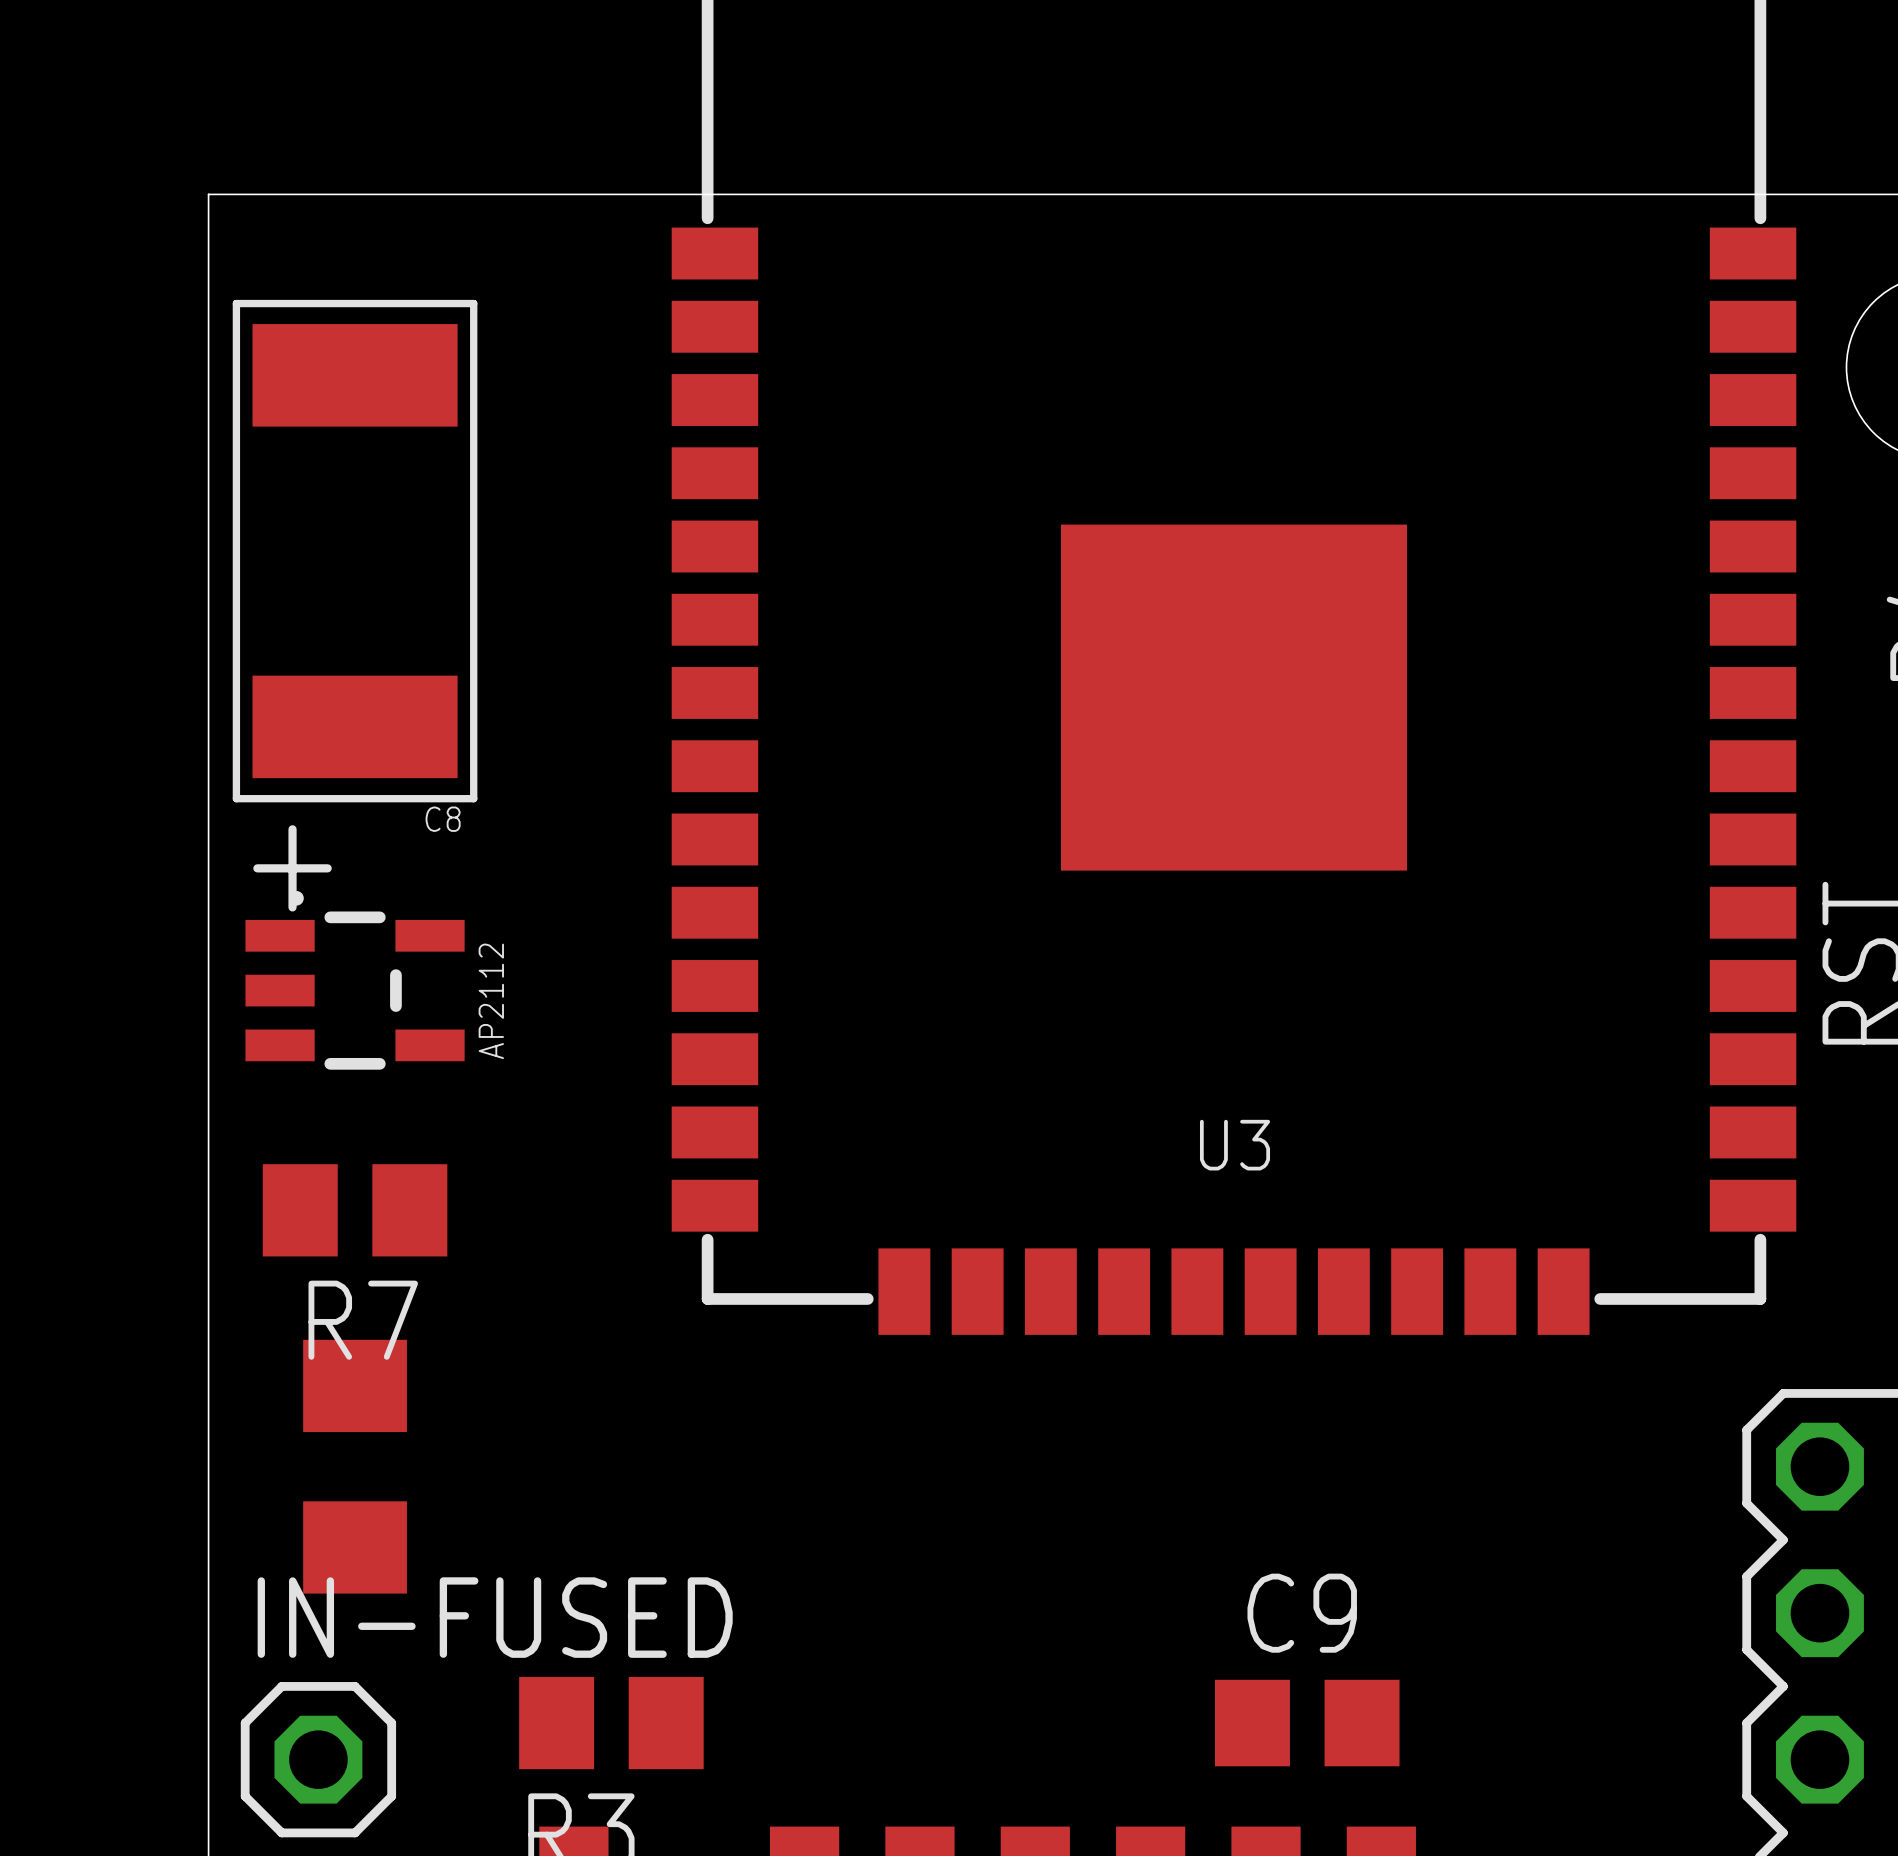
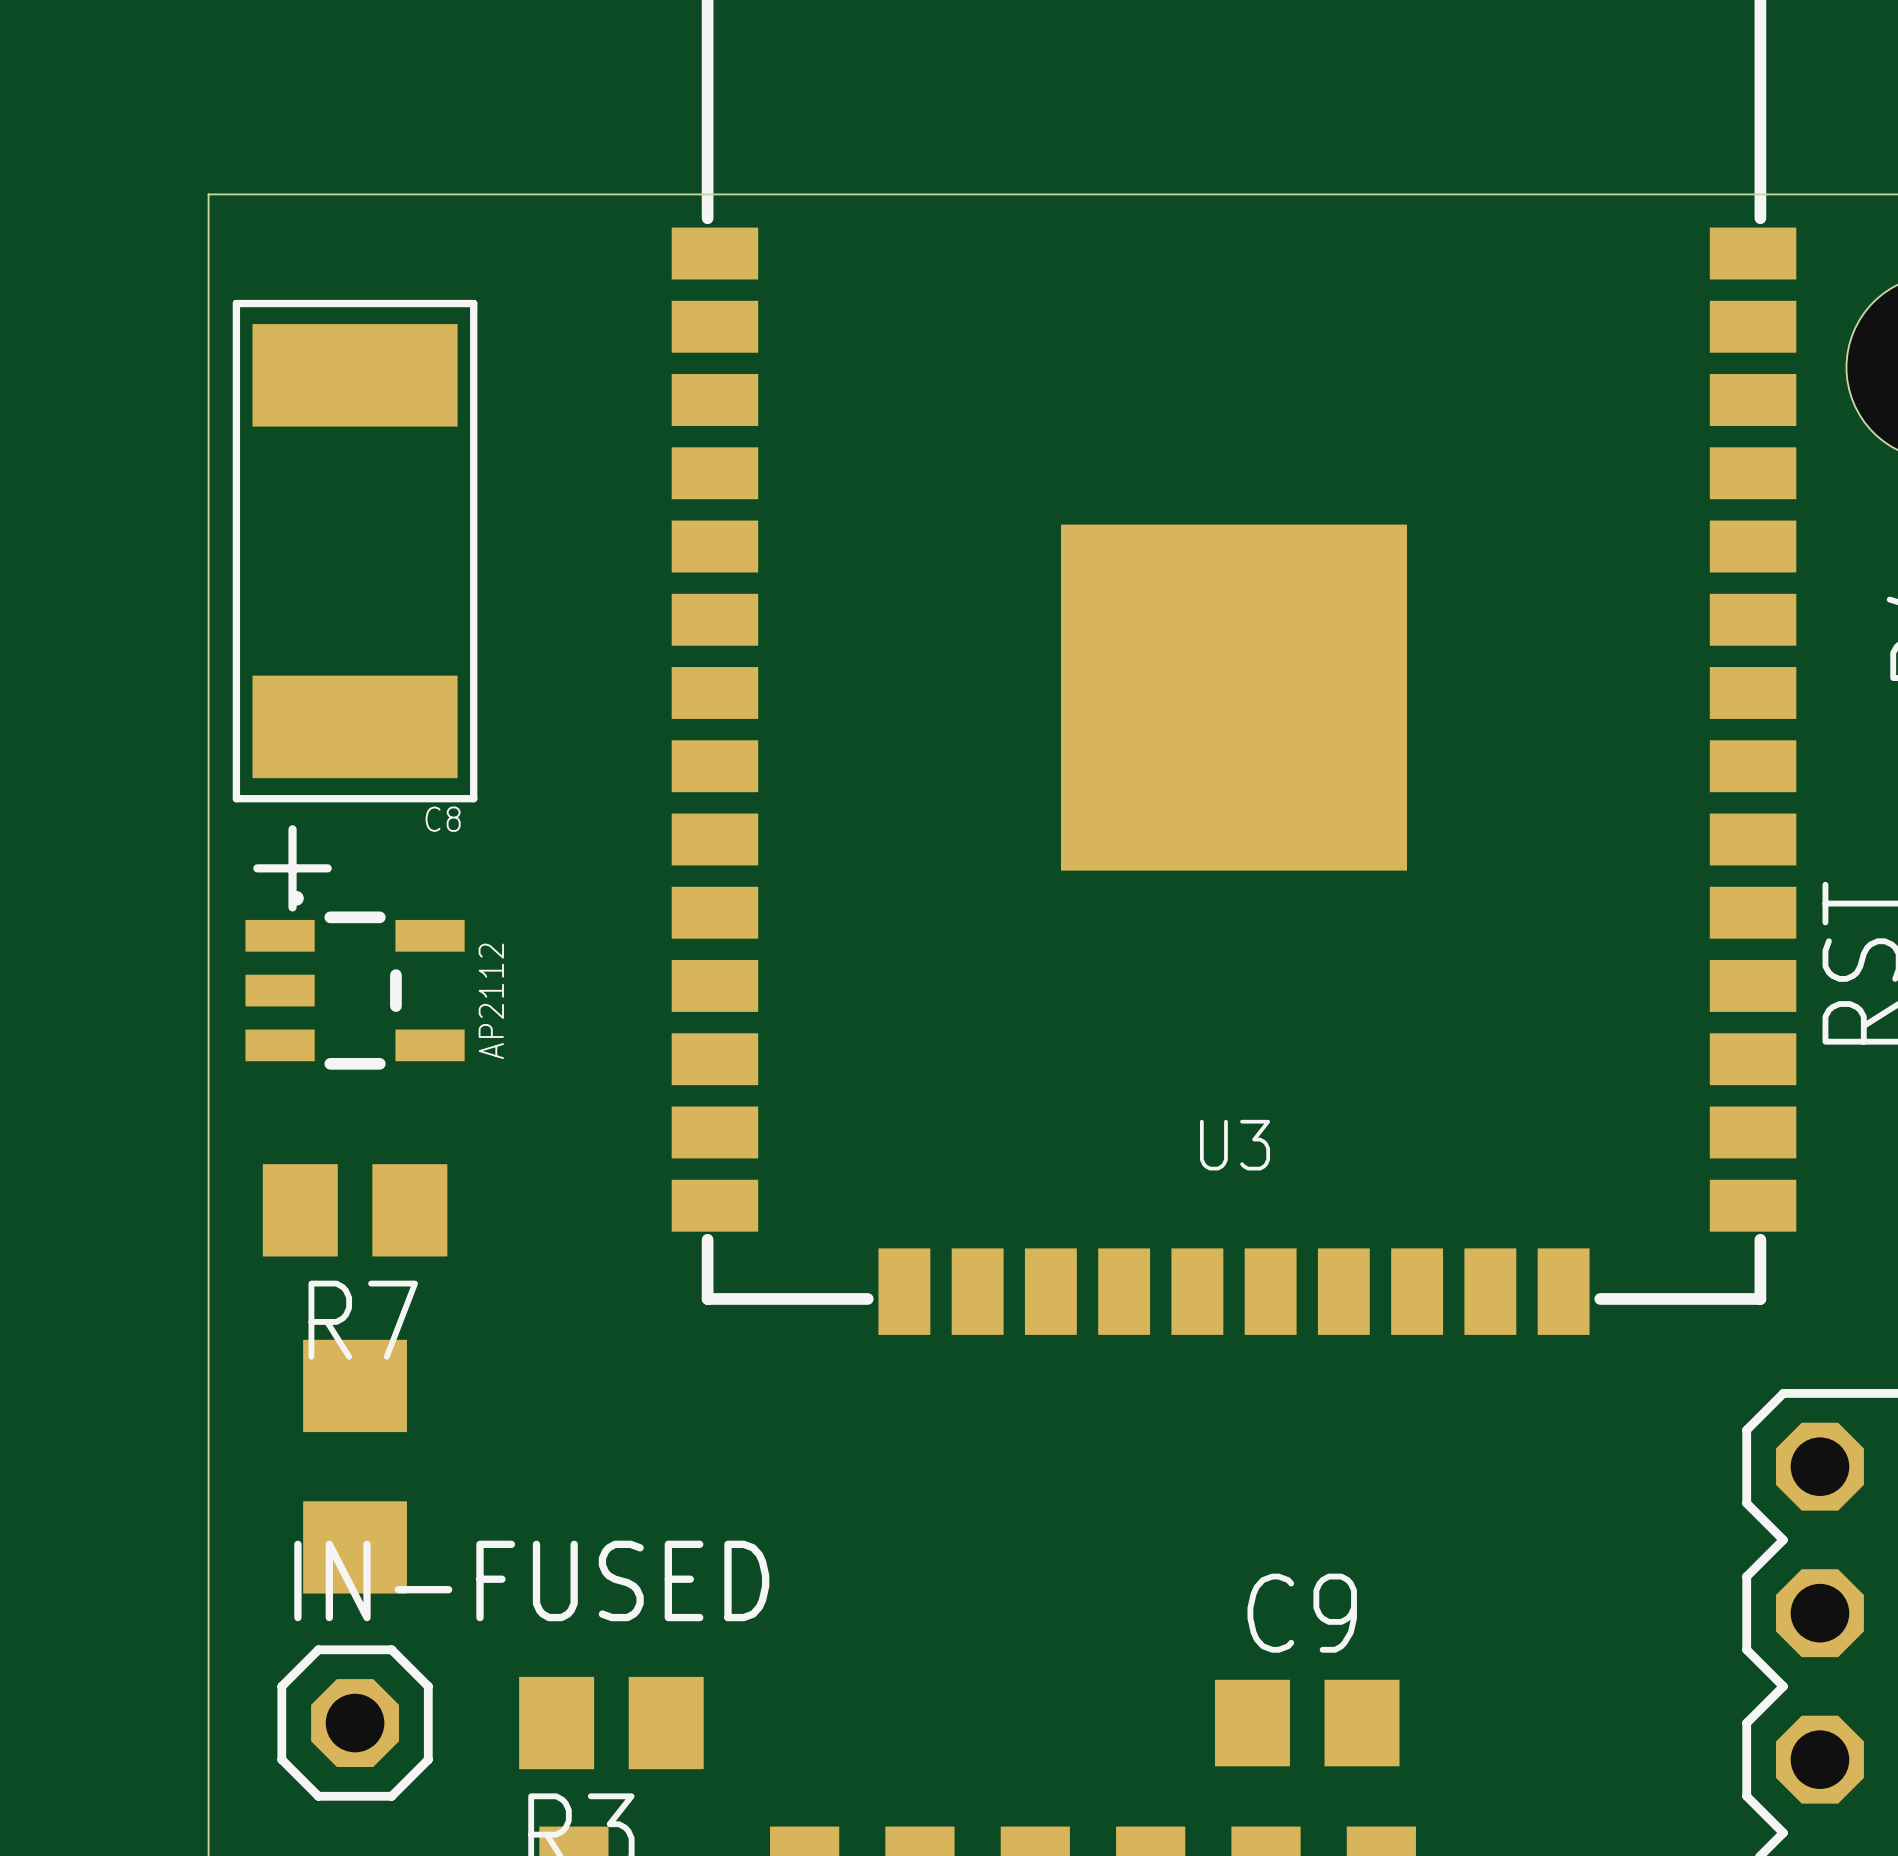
IN-FUSED position: (318, 1759) -> (355, 1723)

